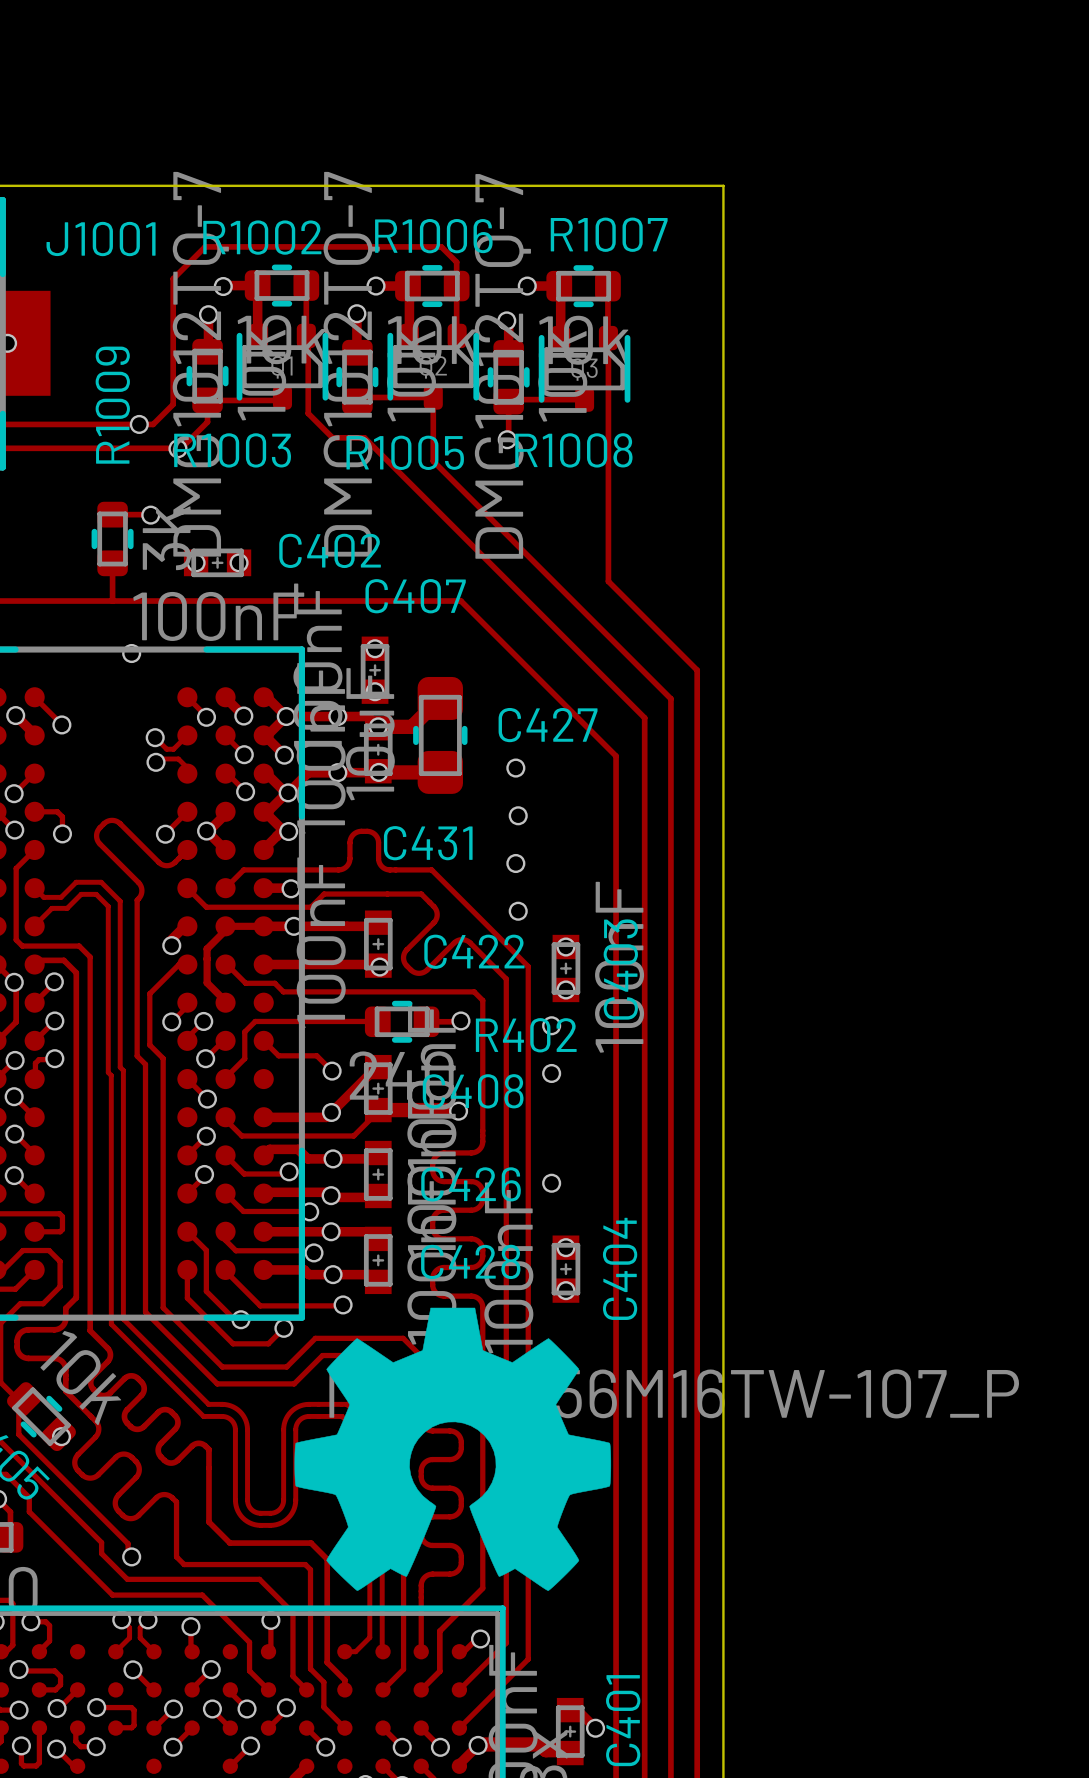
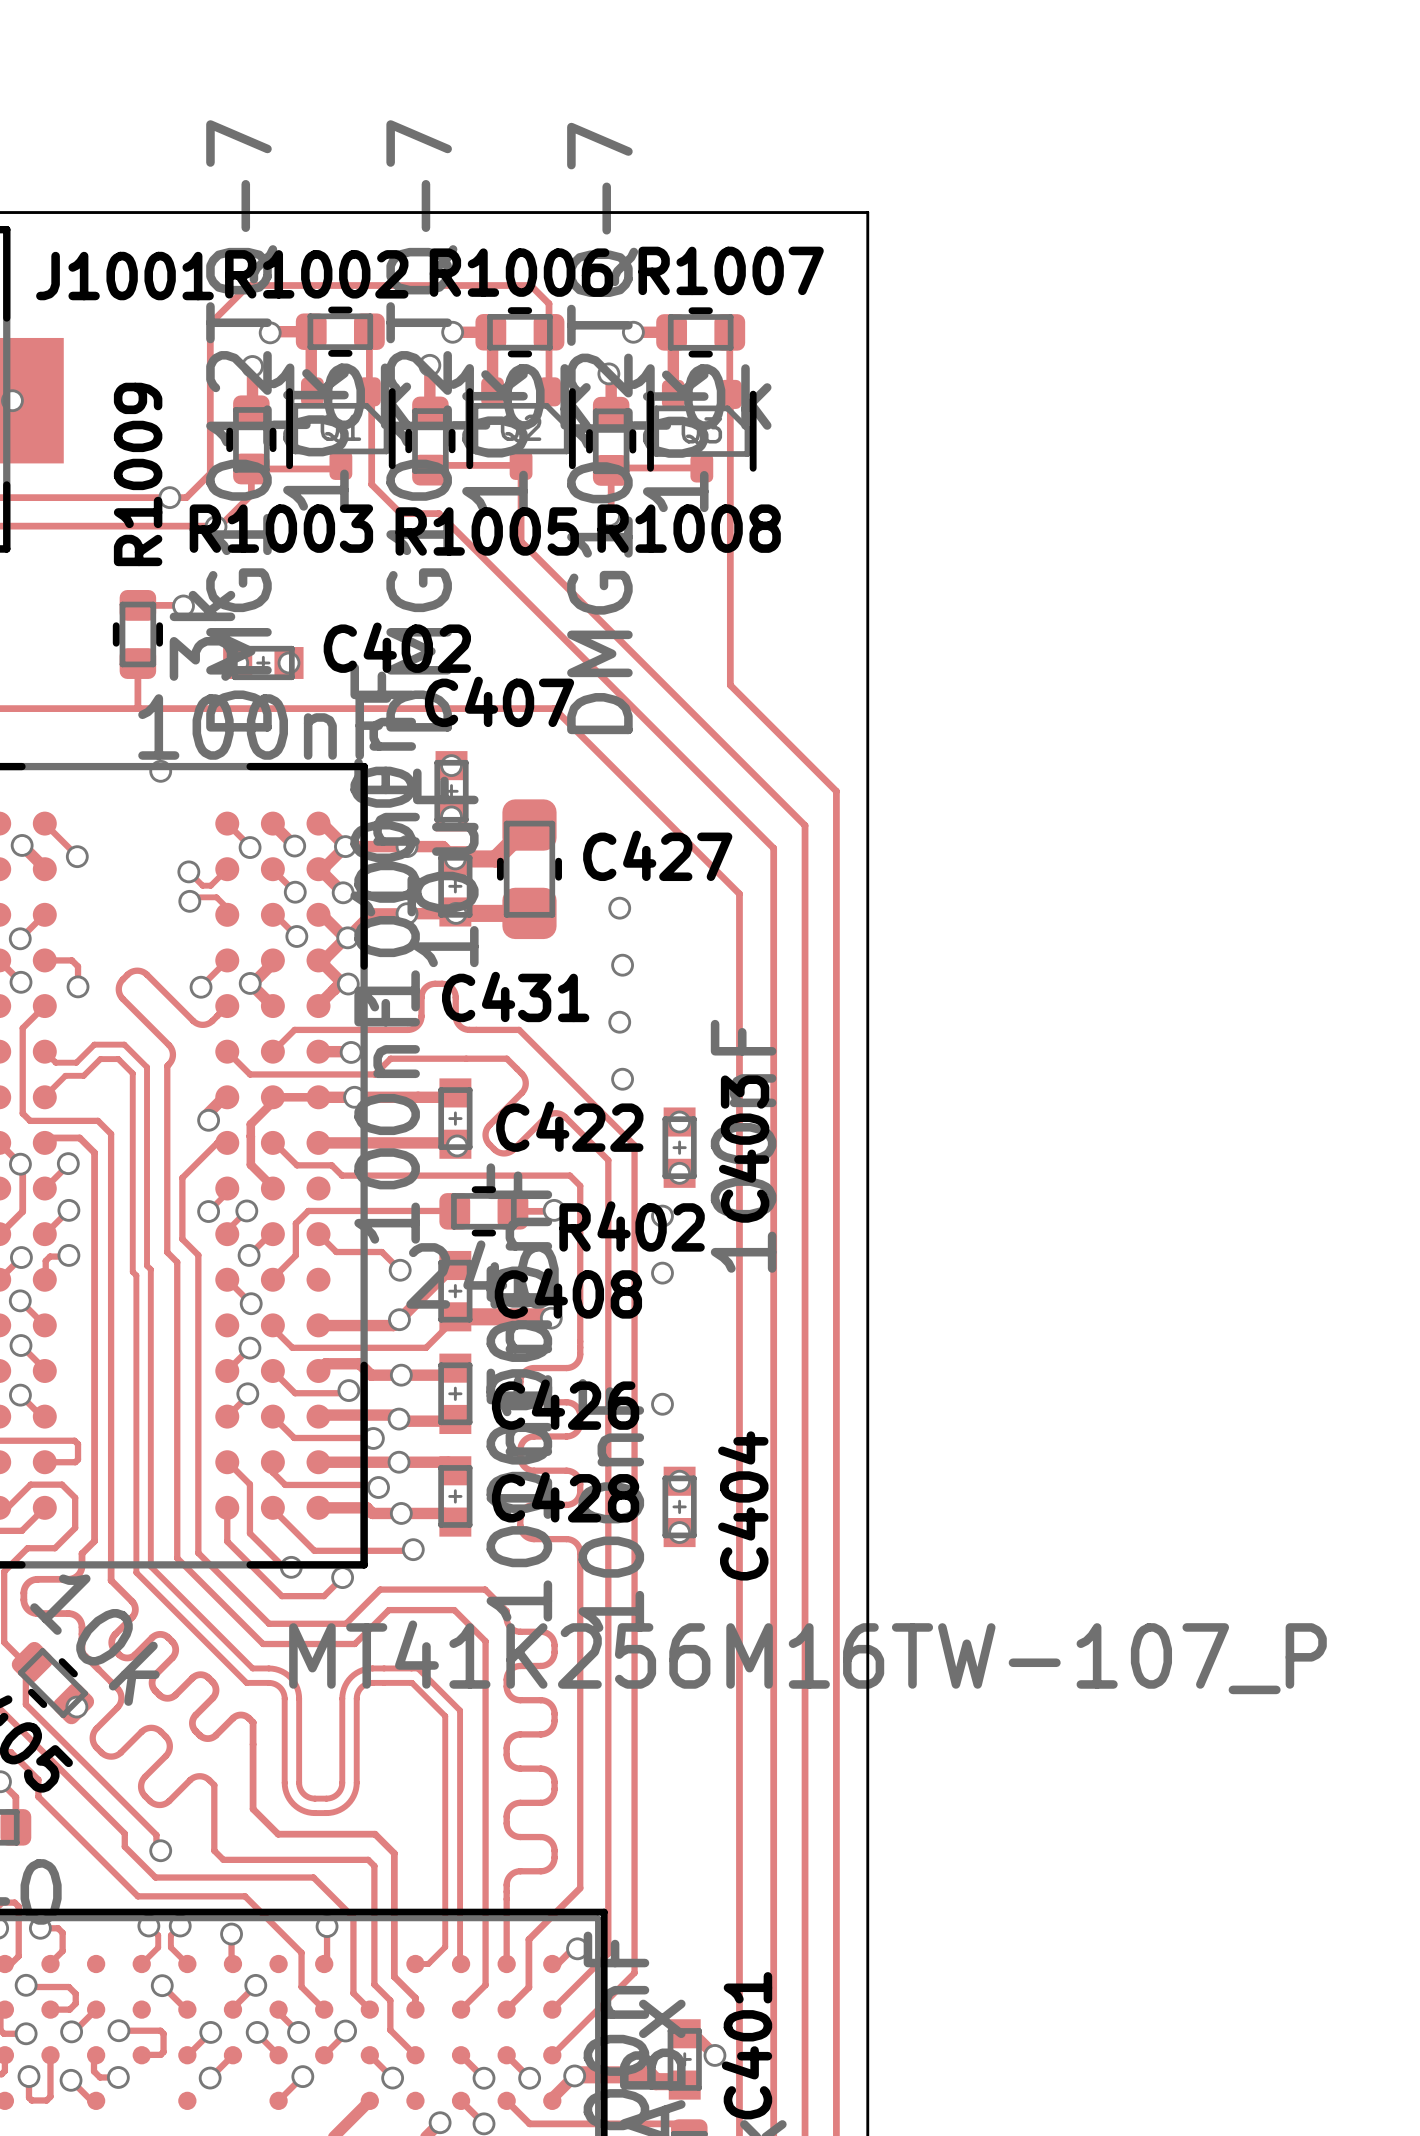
drawing: [294, 1307, 612, 1591] -> none

